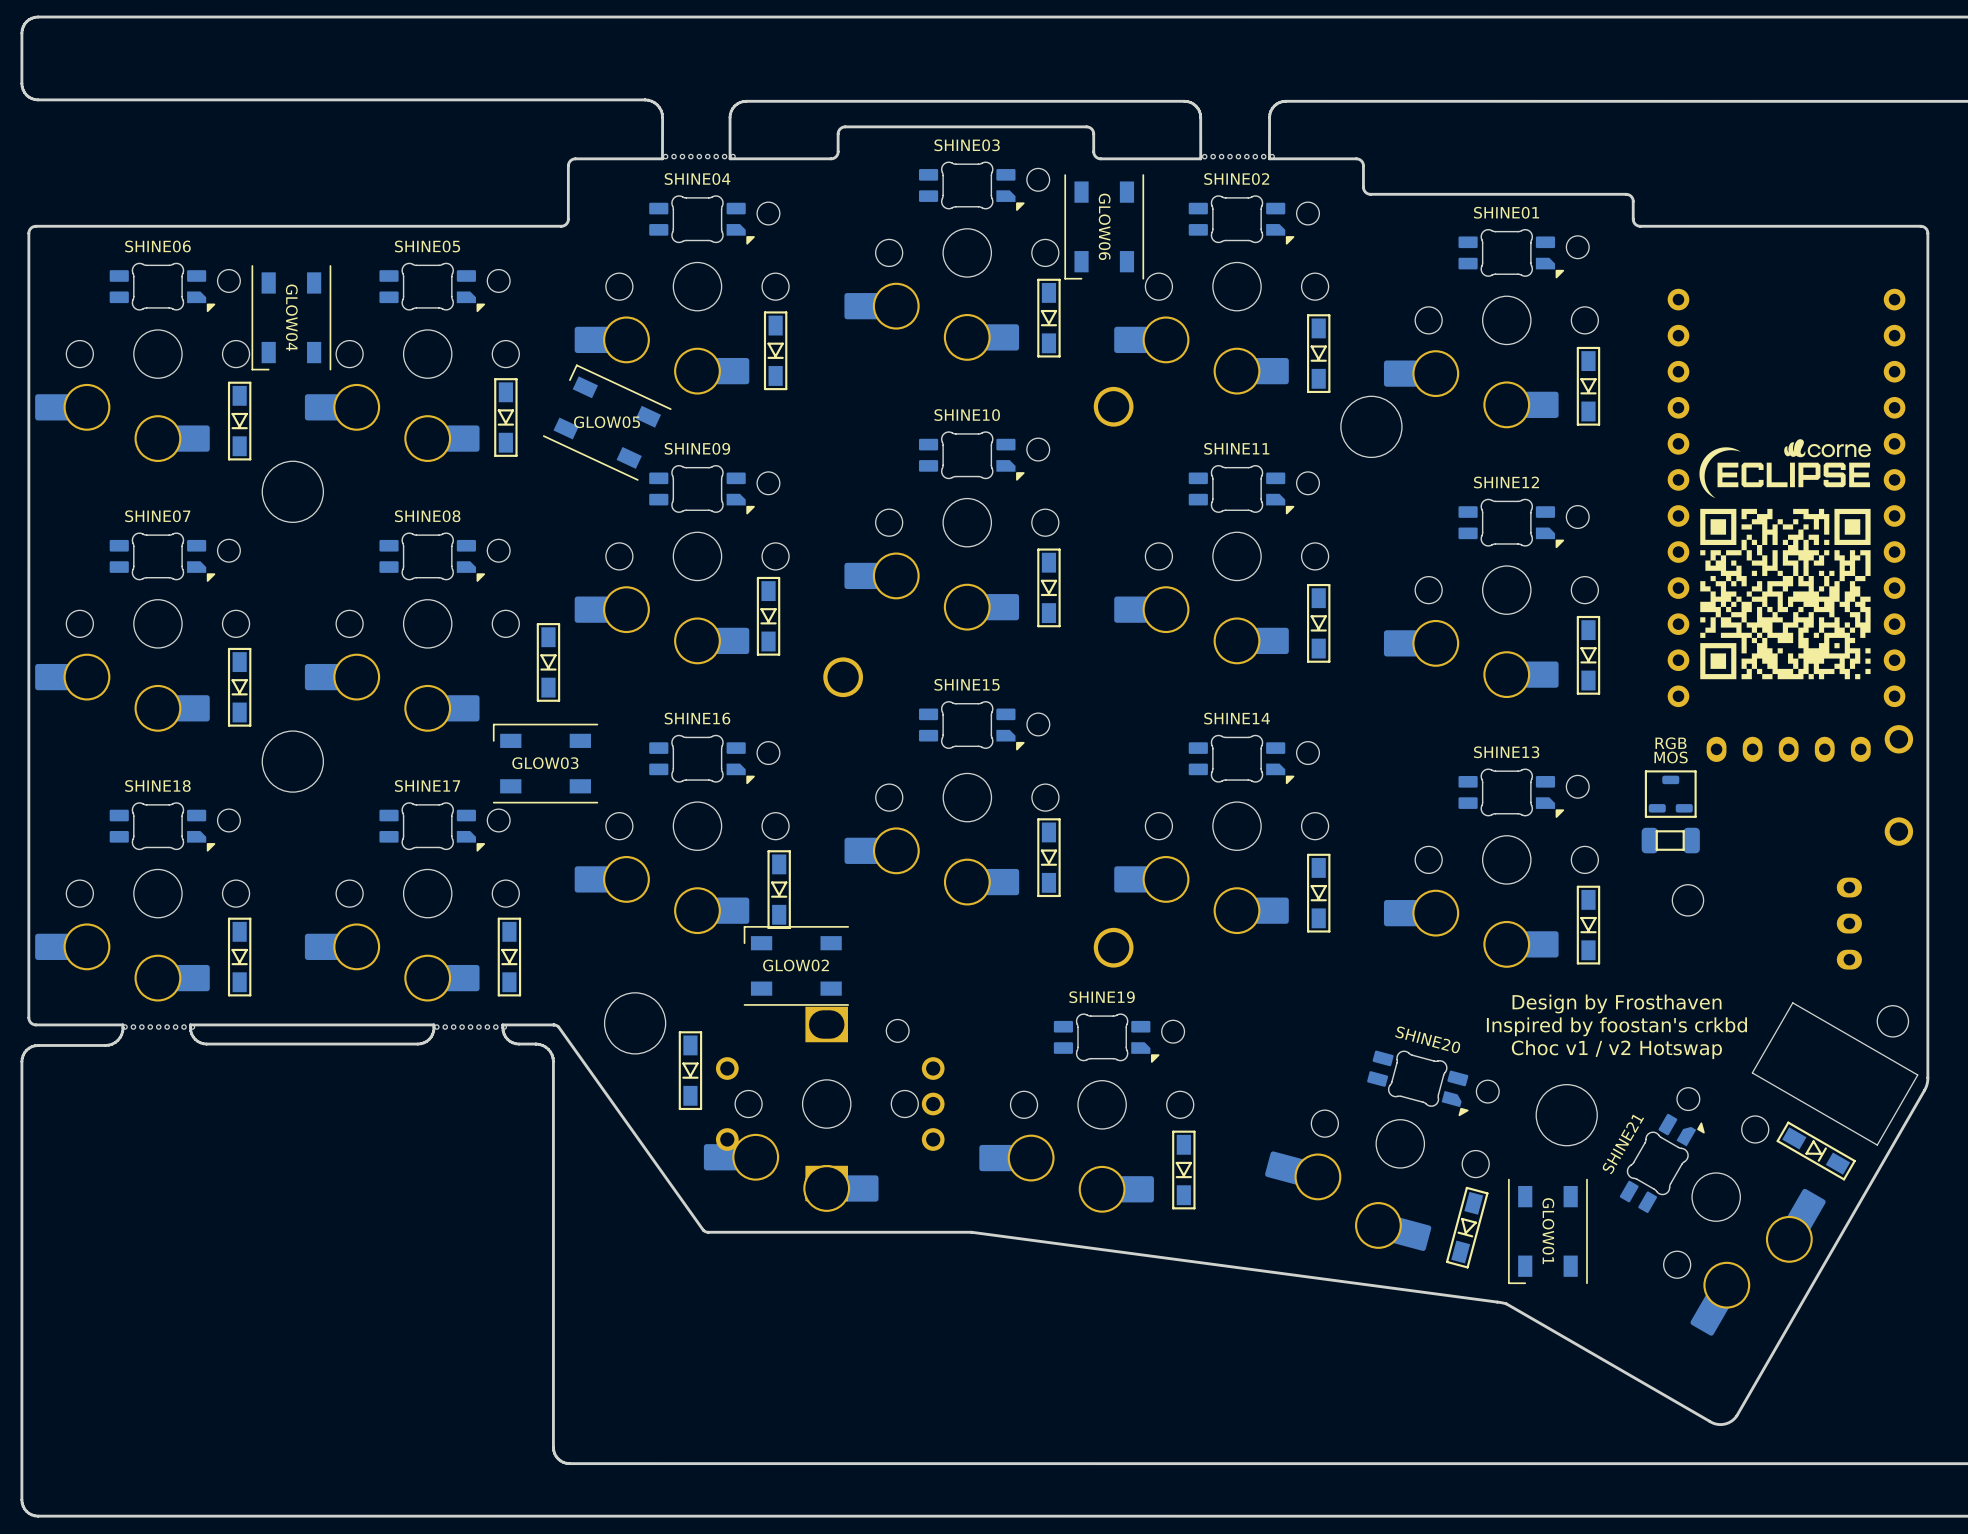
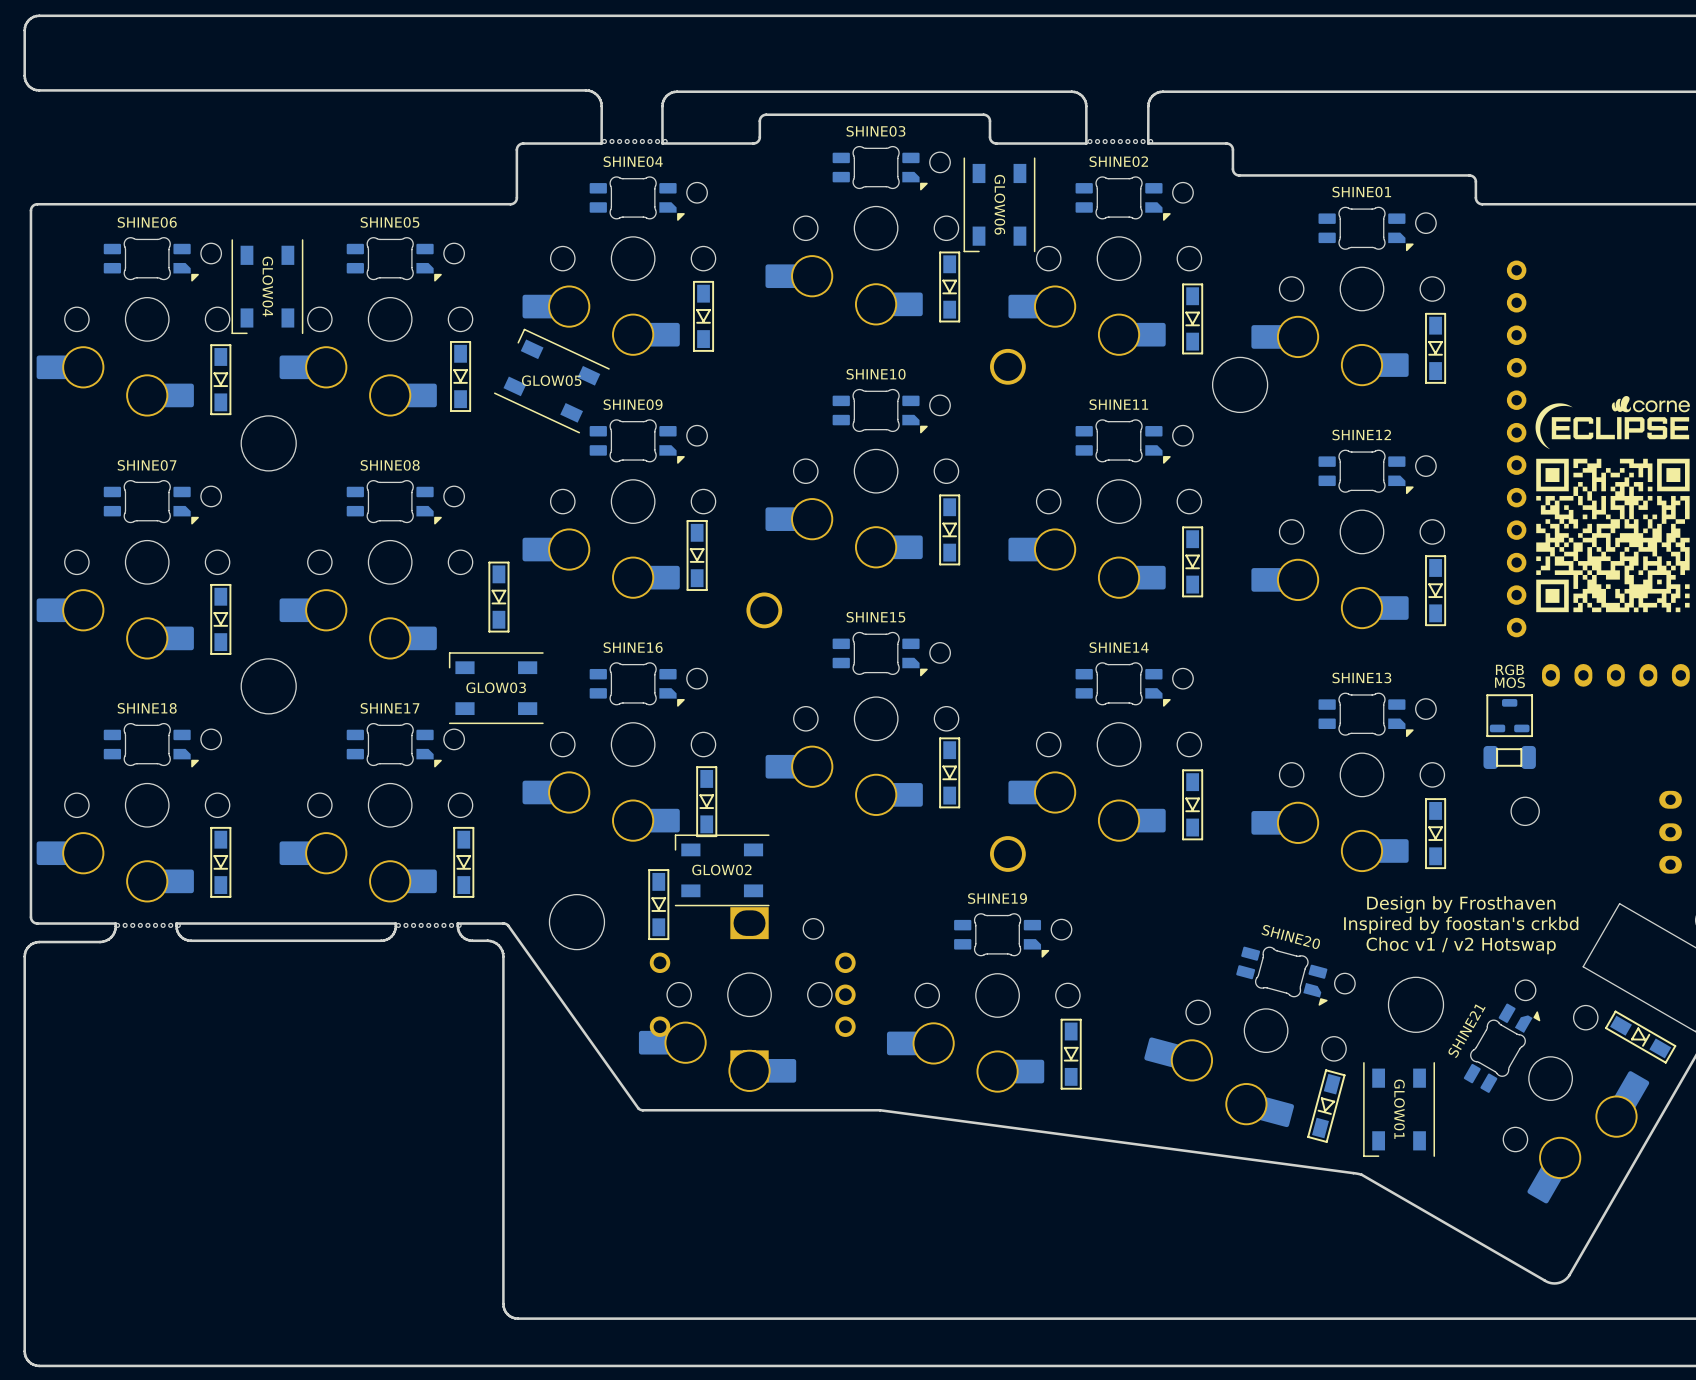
part position: (690, 1070) -> (658, 904)

